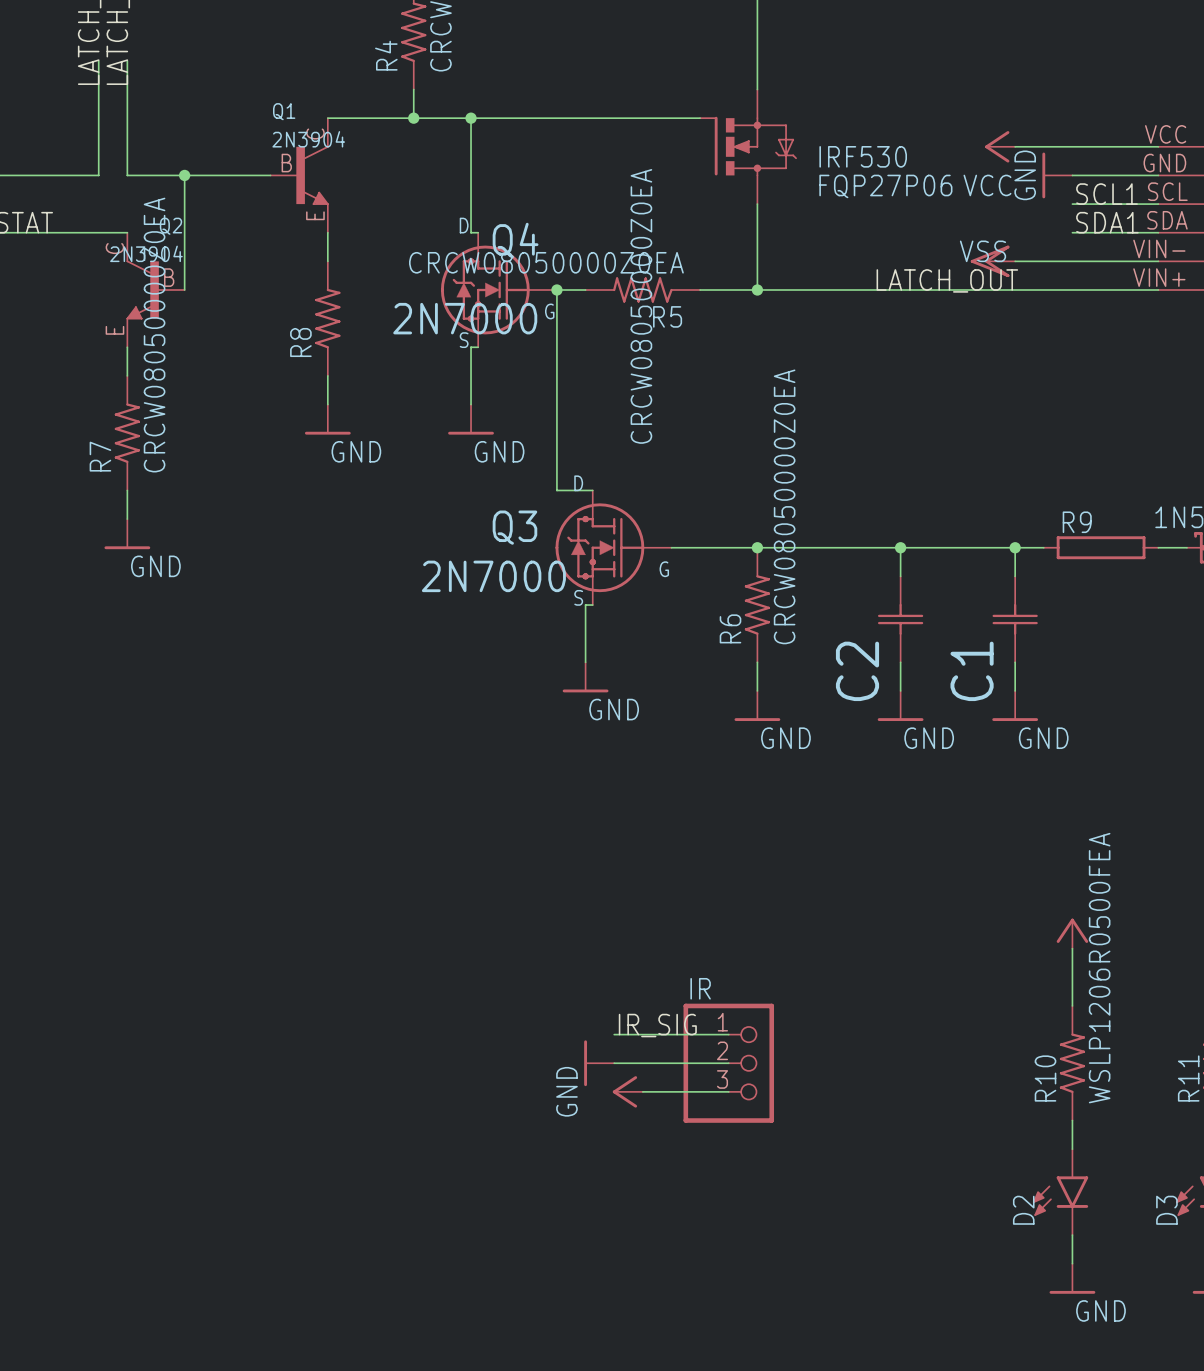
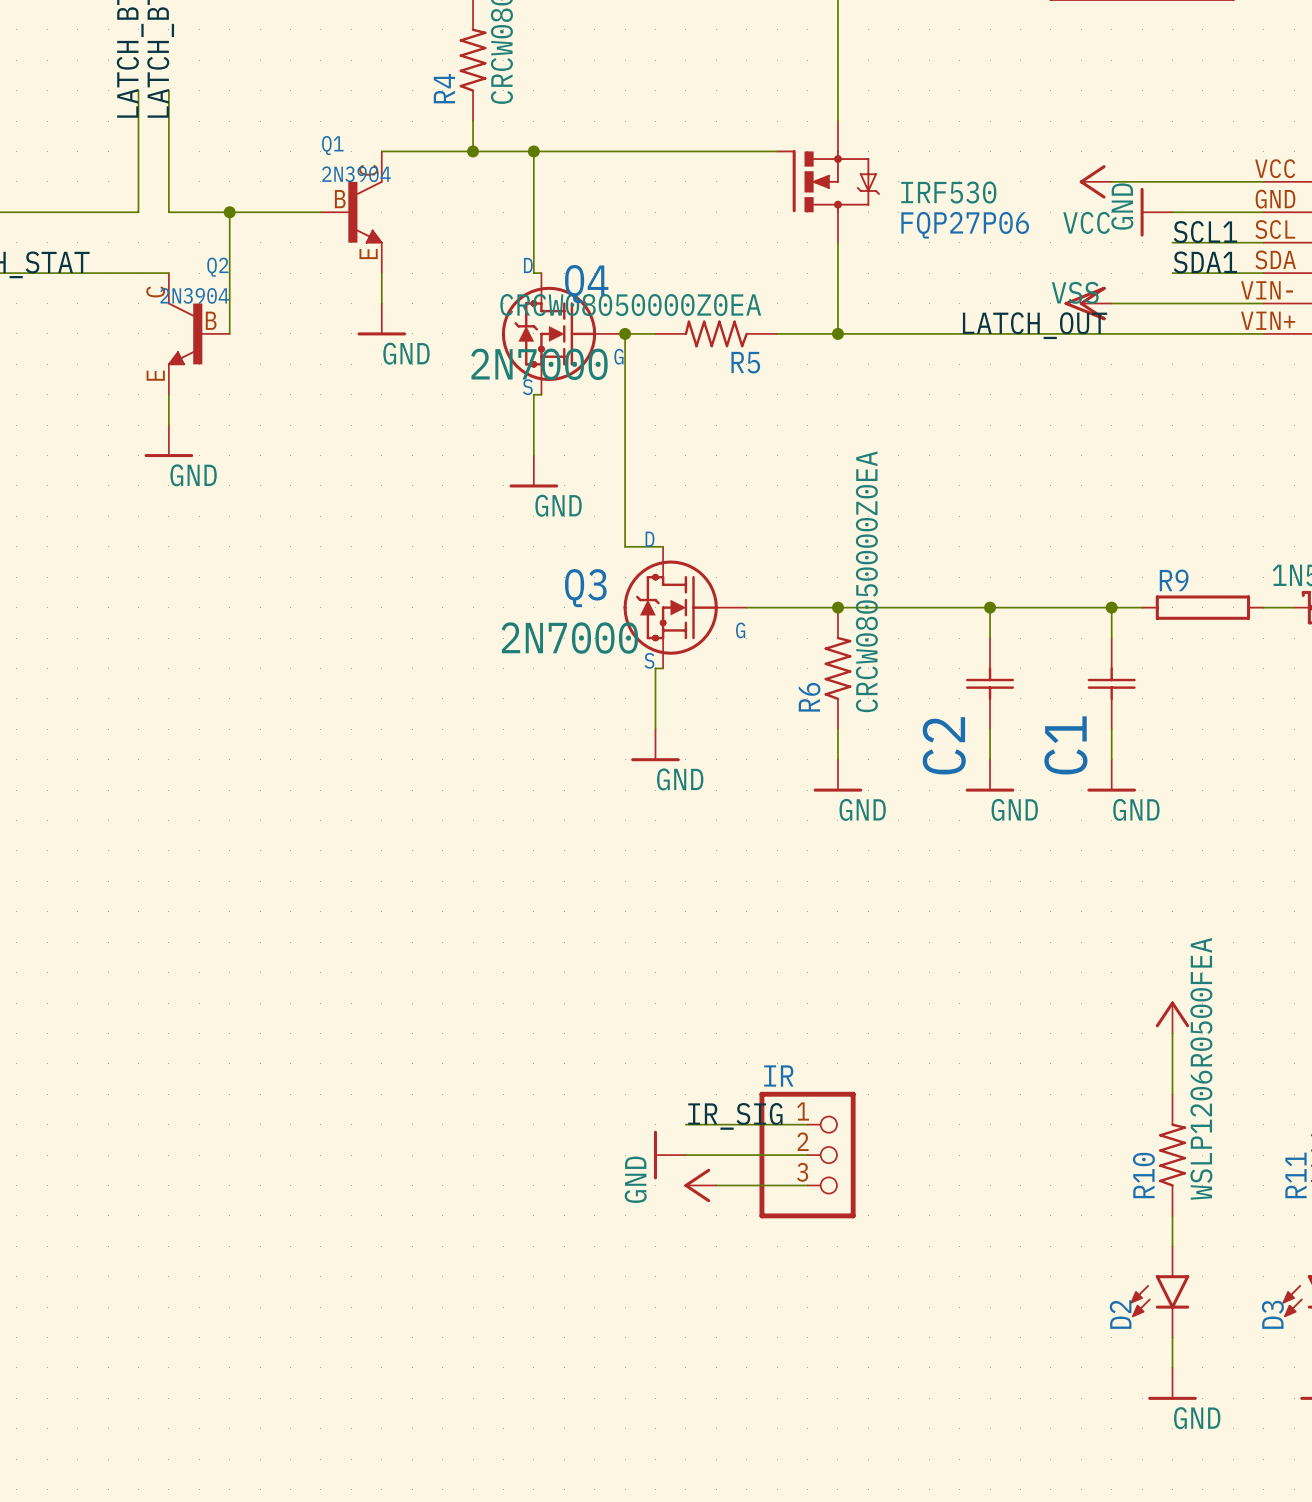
power symbol: none -> GND (381, 319)
R8: CRCW08050000Z0EA (327, 318) -> none
wire: (327, 375) (327, 404) -> none
power symbol: none -> GND (168, 441)
power symbol: GND (327, 419) -> none
R7: CRCW08050000Z0EA (127, 433) -> none
wire: (127, 490) (127, 519) -> none
power symbol: GND (127, 534) -> none

